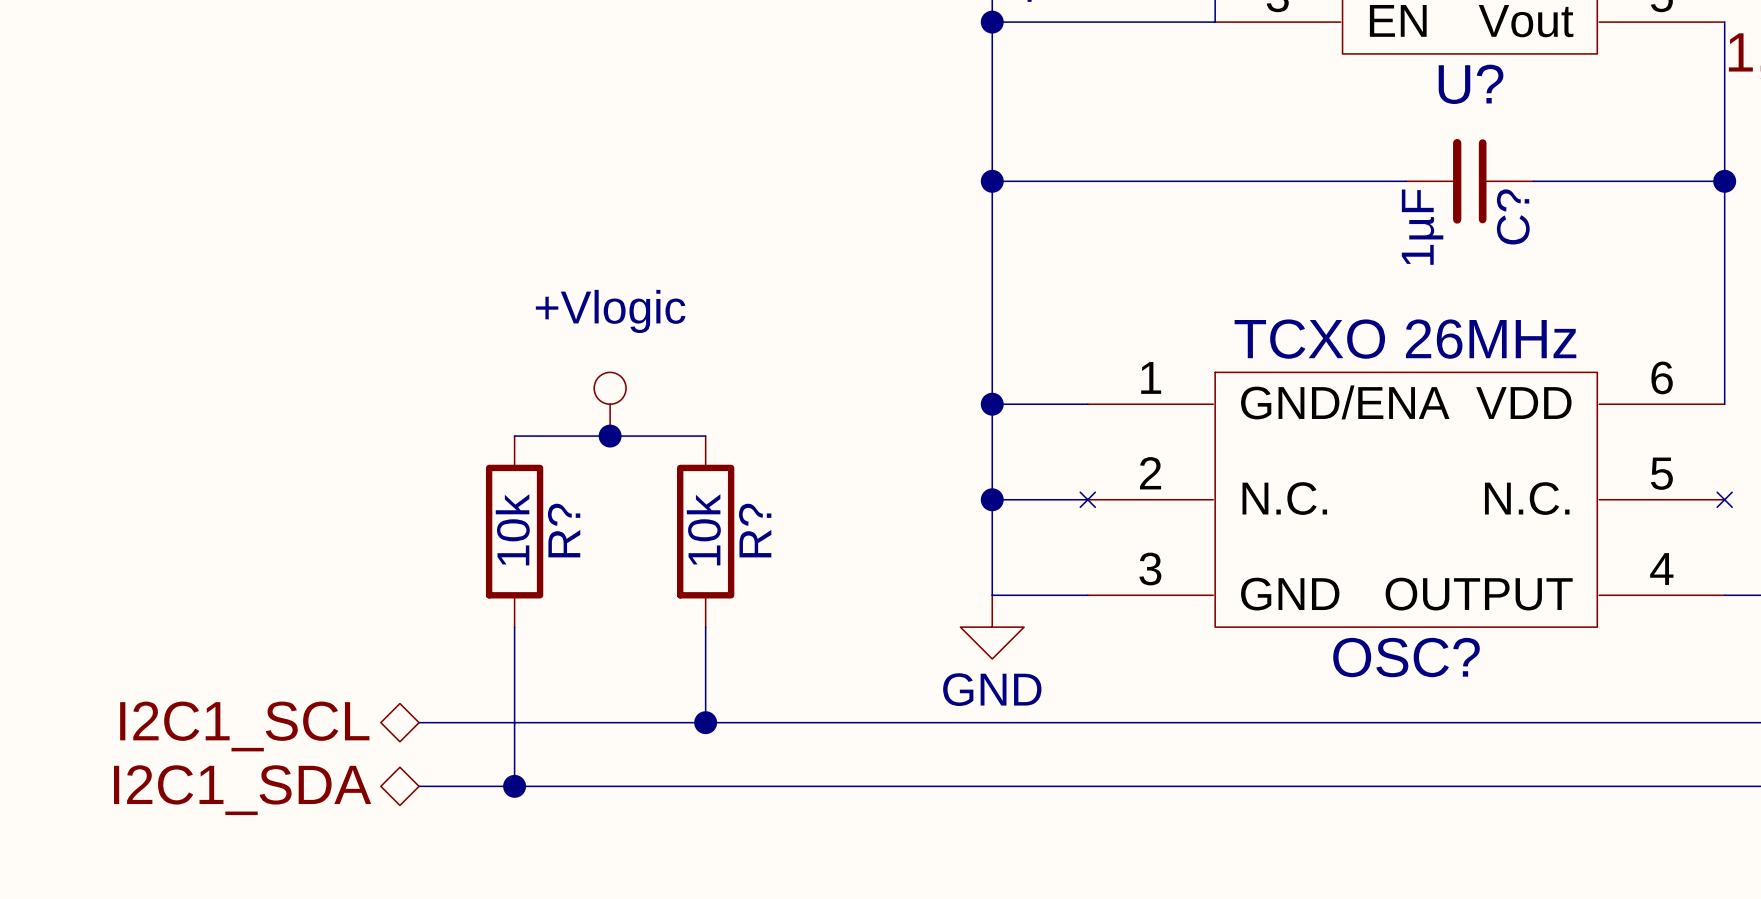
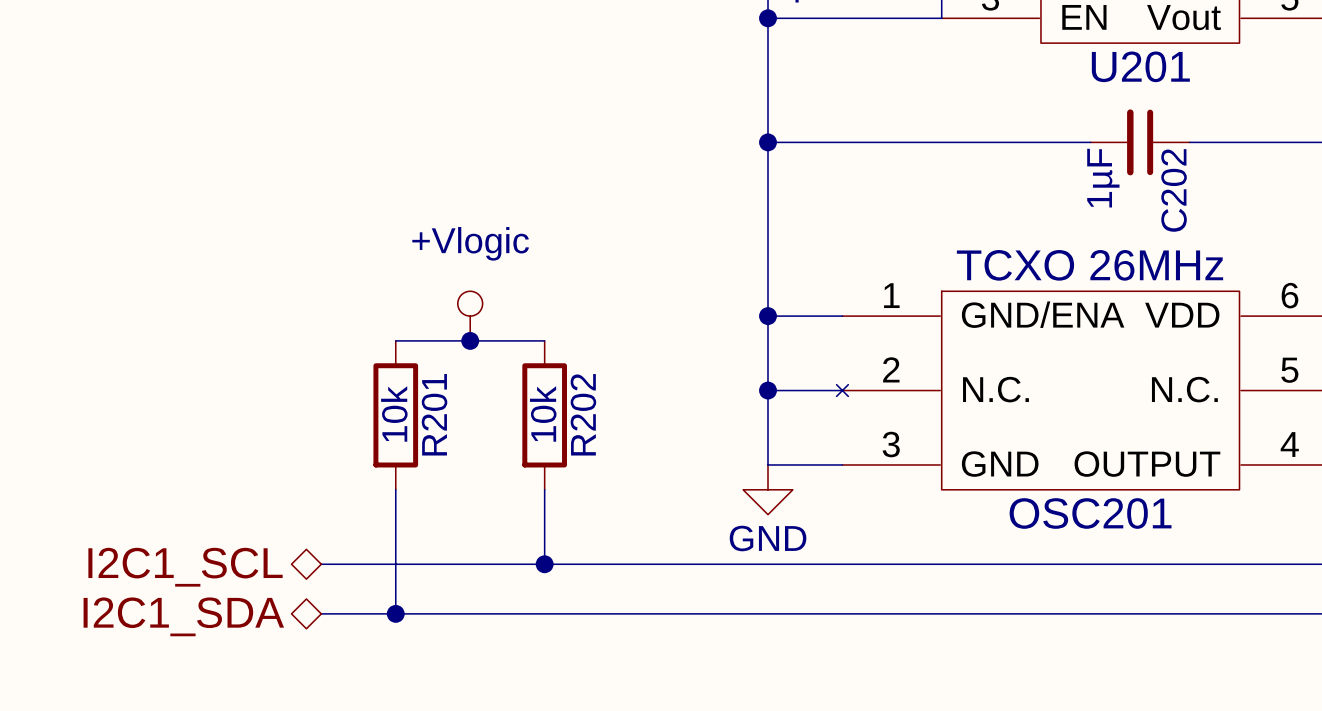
U? name: U? (1471, 84) -> U201 (1140, 66)
C? name: C? (1513, 216) -> C202 (1174, 190)
R? name: R? (564, 530) -> R201 (434, 414)
R? name: R? (755, 530) -> R202 (583, 414)
OSC? name: OSC? (1406, 657) -> OSC201 (1090, 513)

